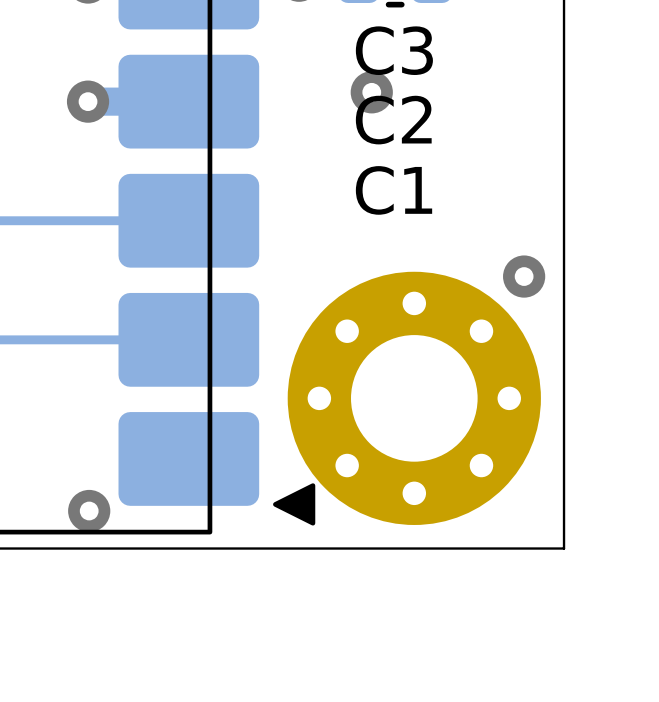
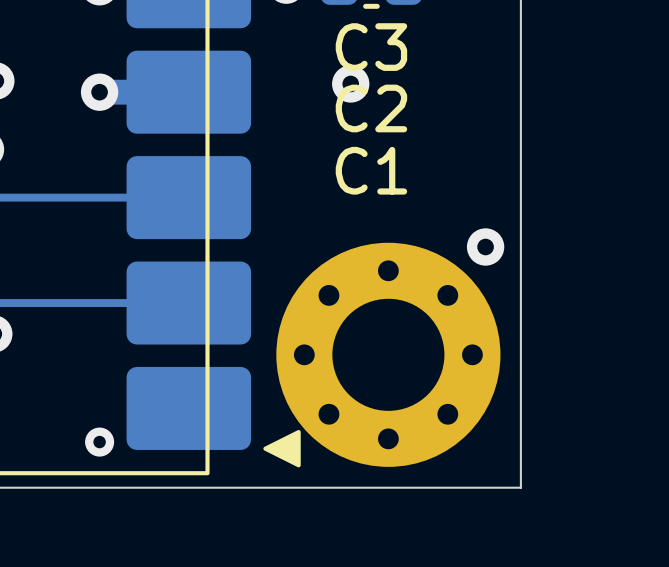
via size: [68, 489, 111, 533] -> [85, 427, 115, 457]

